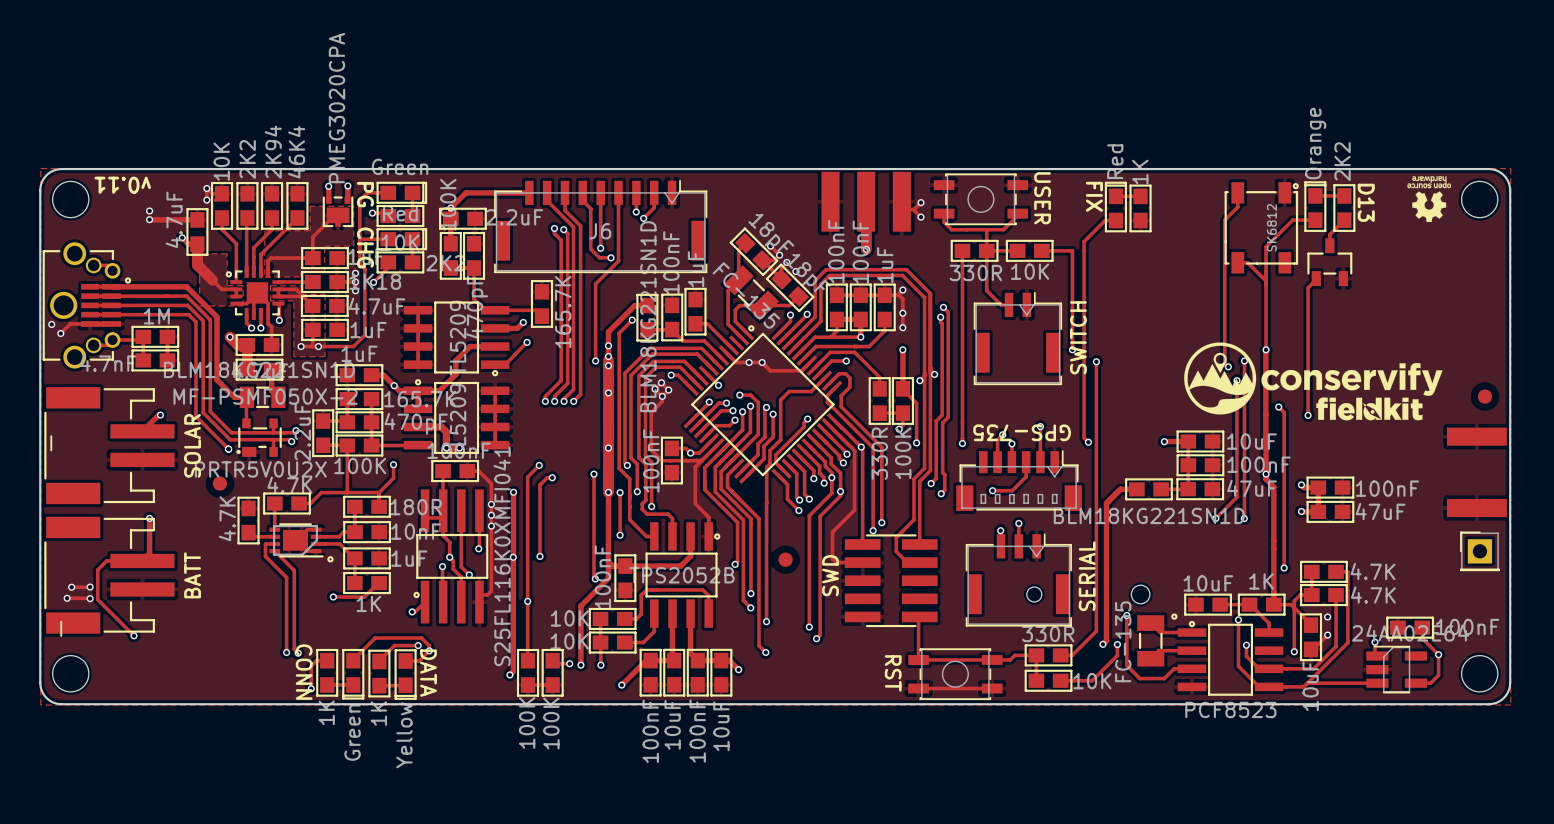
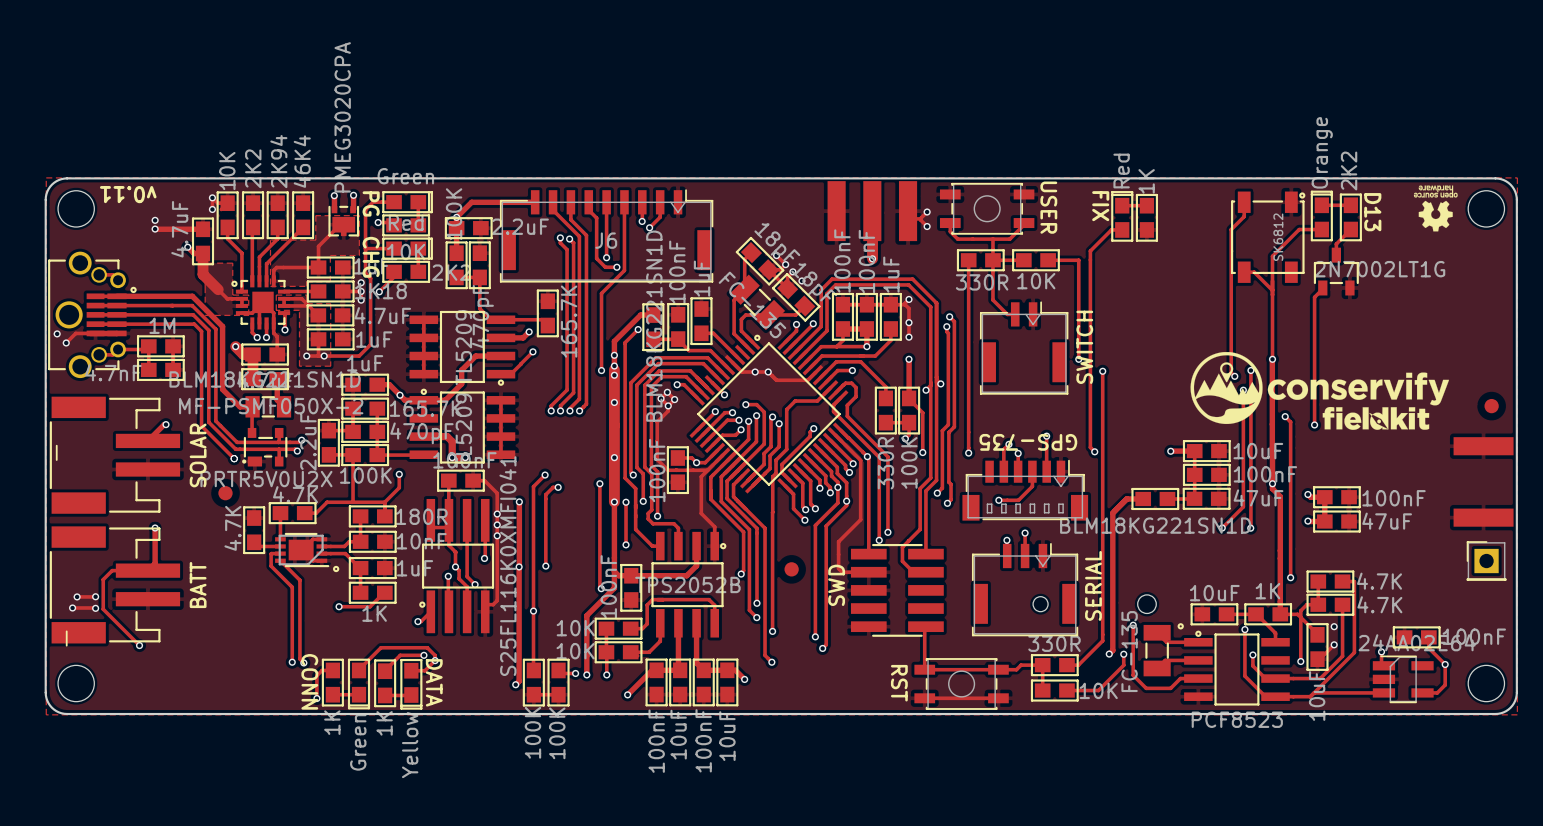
part value: none -> 2N7002LT1G (1379, 269)

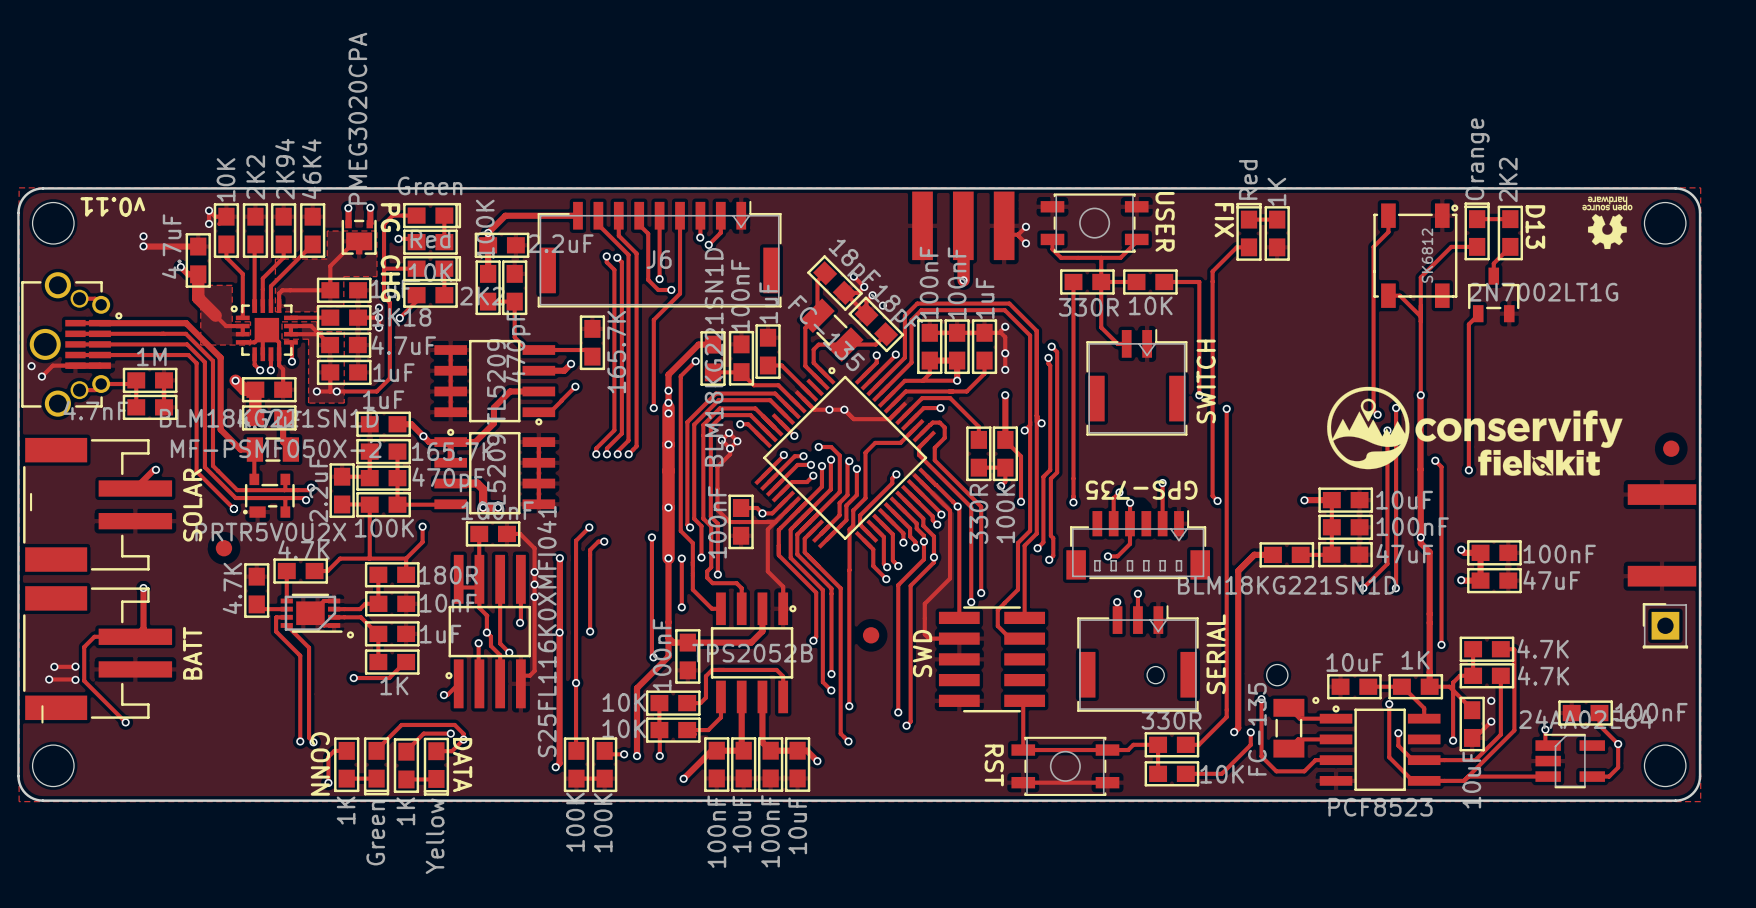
track: (1032, 471) (1032, 486) (1018, 500) (1007, 500) -> (1129, 523) (1129, 544) (1117, 556)

